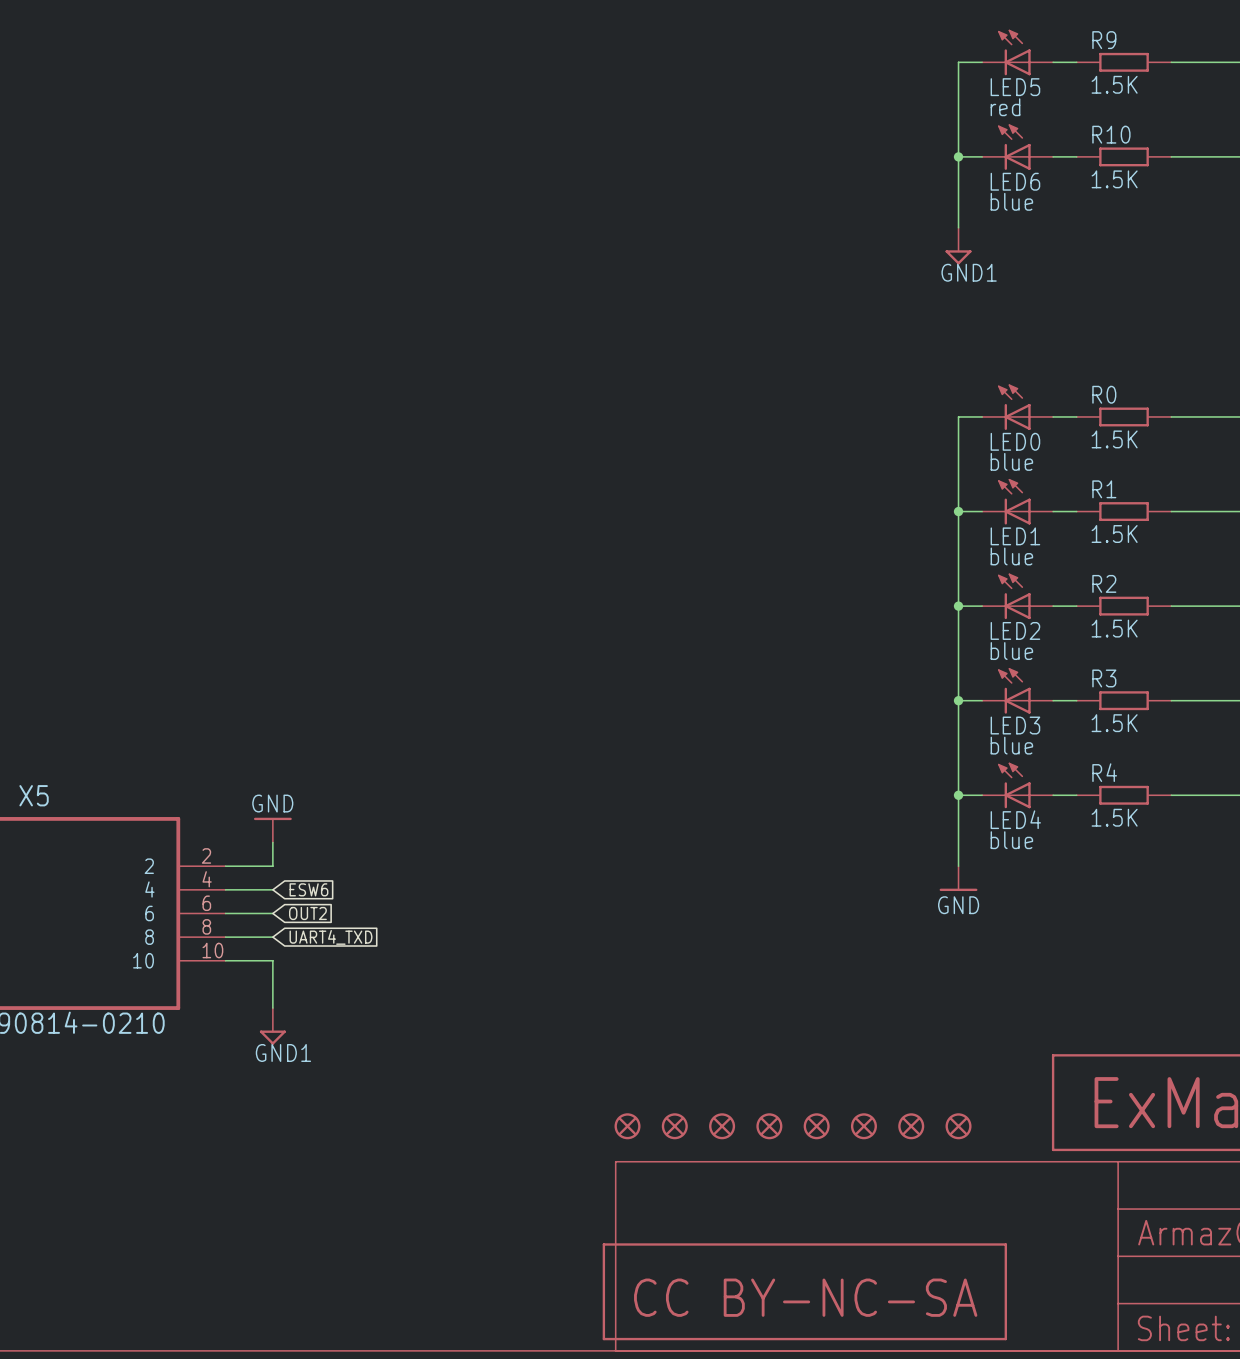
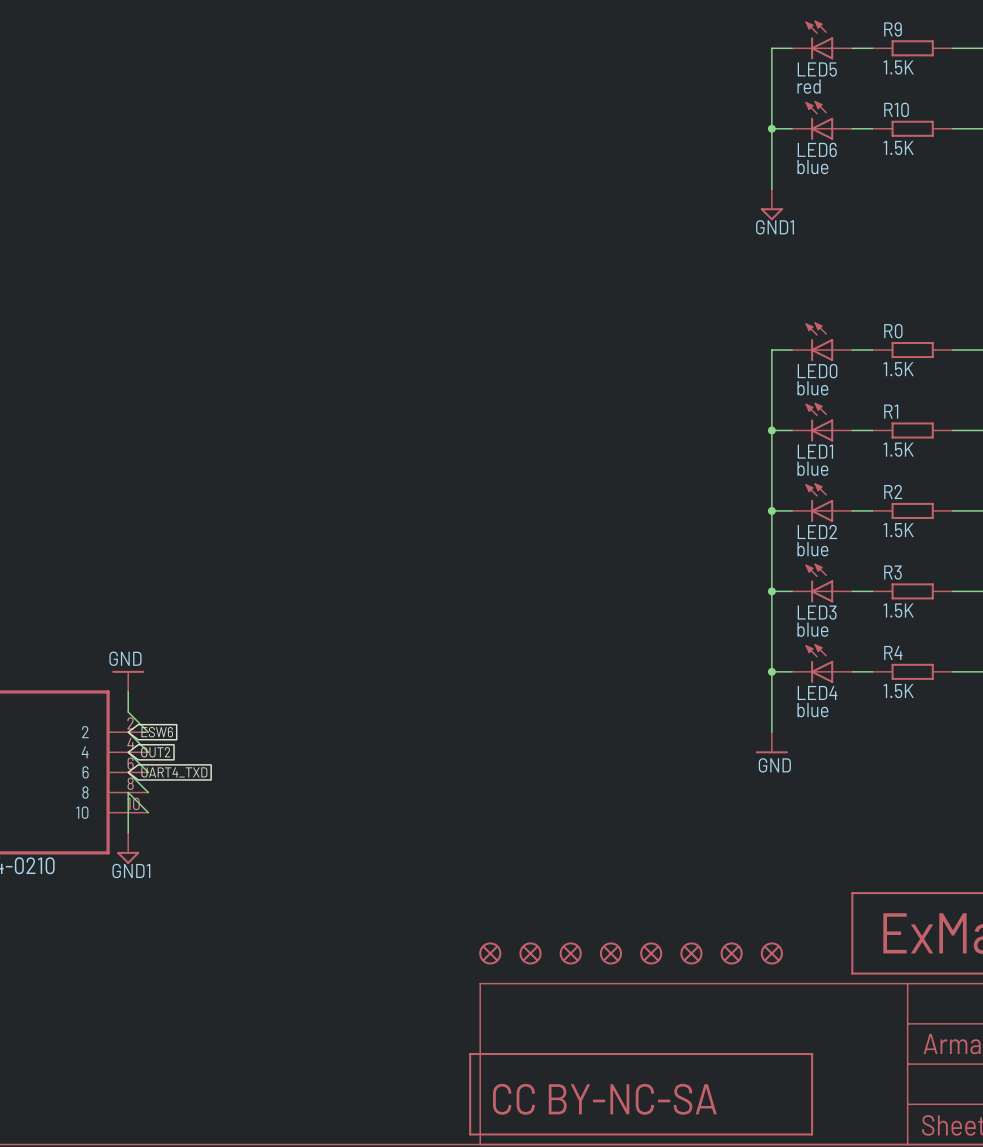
power symbol position: GND (272, 830) -> GND (128, 681)
wire: (272, 842) (272, 866) (225, 866) -> (128, 691) (128, 712) (148, 732)
wire: (225, 889) (272, 889) -> (148, 752) (128, 732)
global label position: ESW6 (308, 889) -> ESW6 (157, 732)
wire: (225, 913) (272, 913) -> (148, 772) (128, 752)
global label position: OUT2 (307, 913) -> OUT2 (155, 752)
wire: (225, 937) (272, 937) -> (148, 792) (128, 772)
global label position: UART4_TXD (330, 937) -> UART4_TXD (174, 772)
wire: (225, 960) (272, 960) (272, 1008) -> (148, 812) (128, 792) (128, 832)
power symbol position: GND1 (272, 1026) -> GND1 (128, 848)

